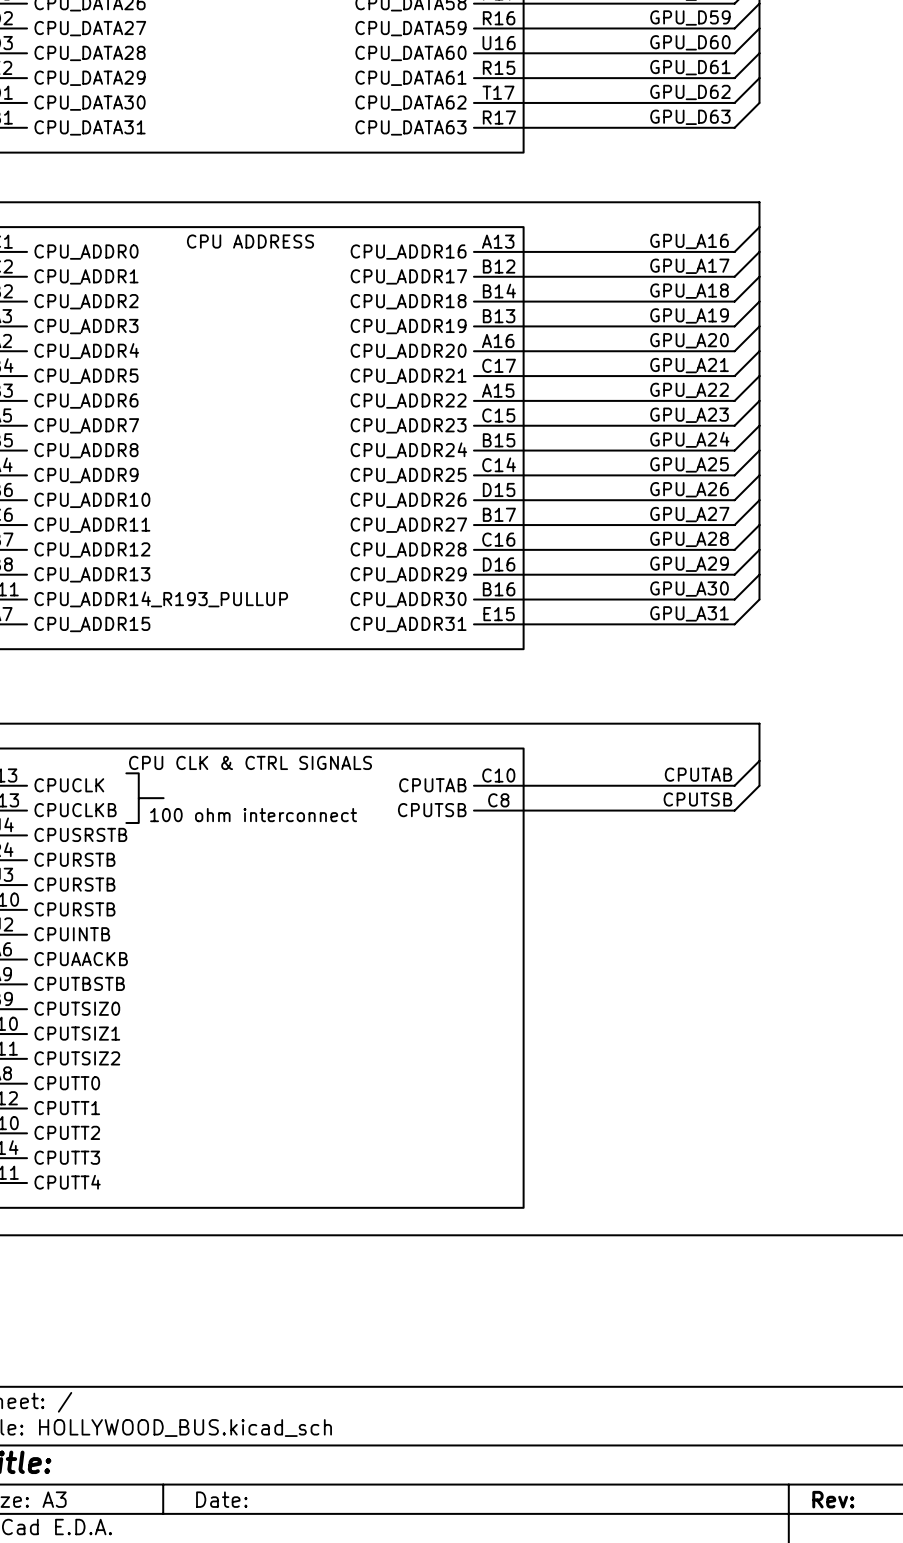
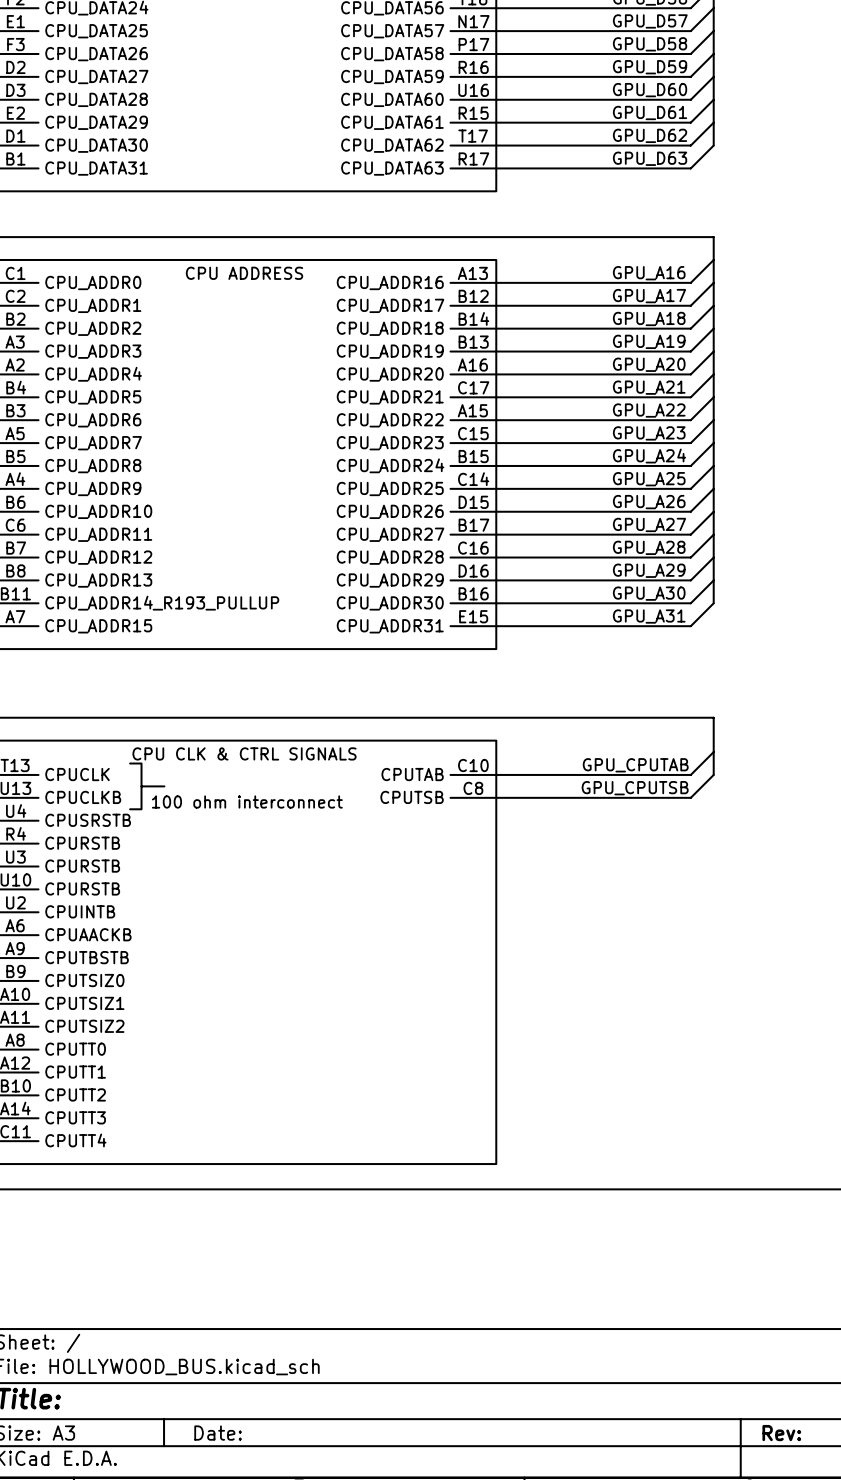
label: CPUTAB (698, 774) -> GPU_CPUTAB (635, 765)
label: CPUTSB (697, 799) -> GPU_CPUTSB (635, 788)

